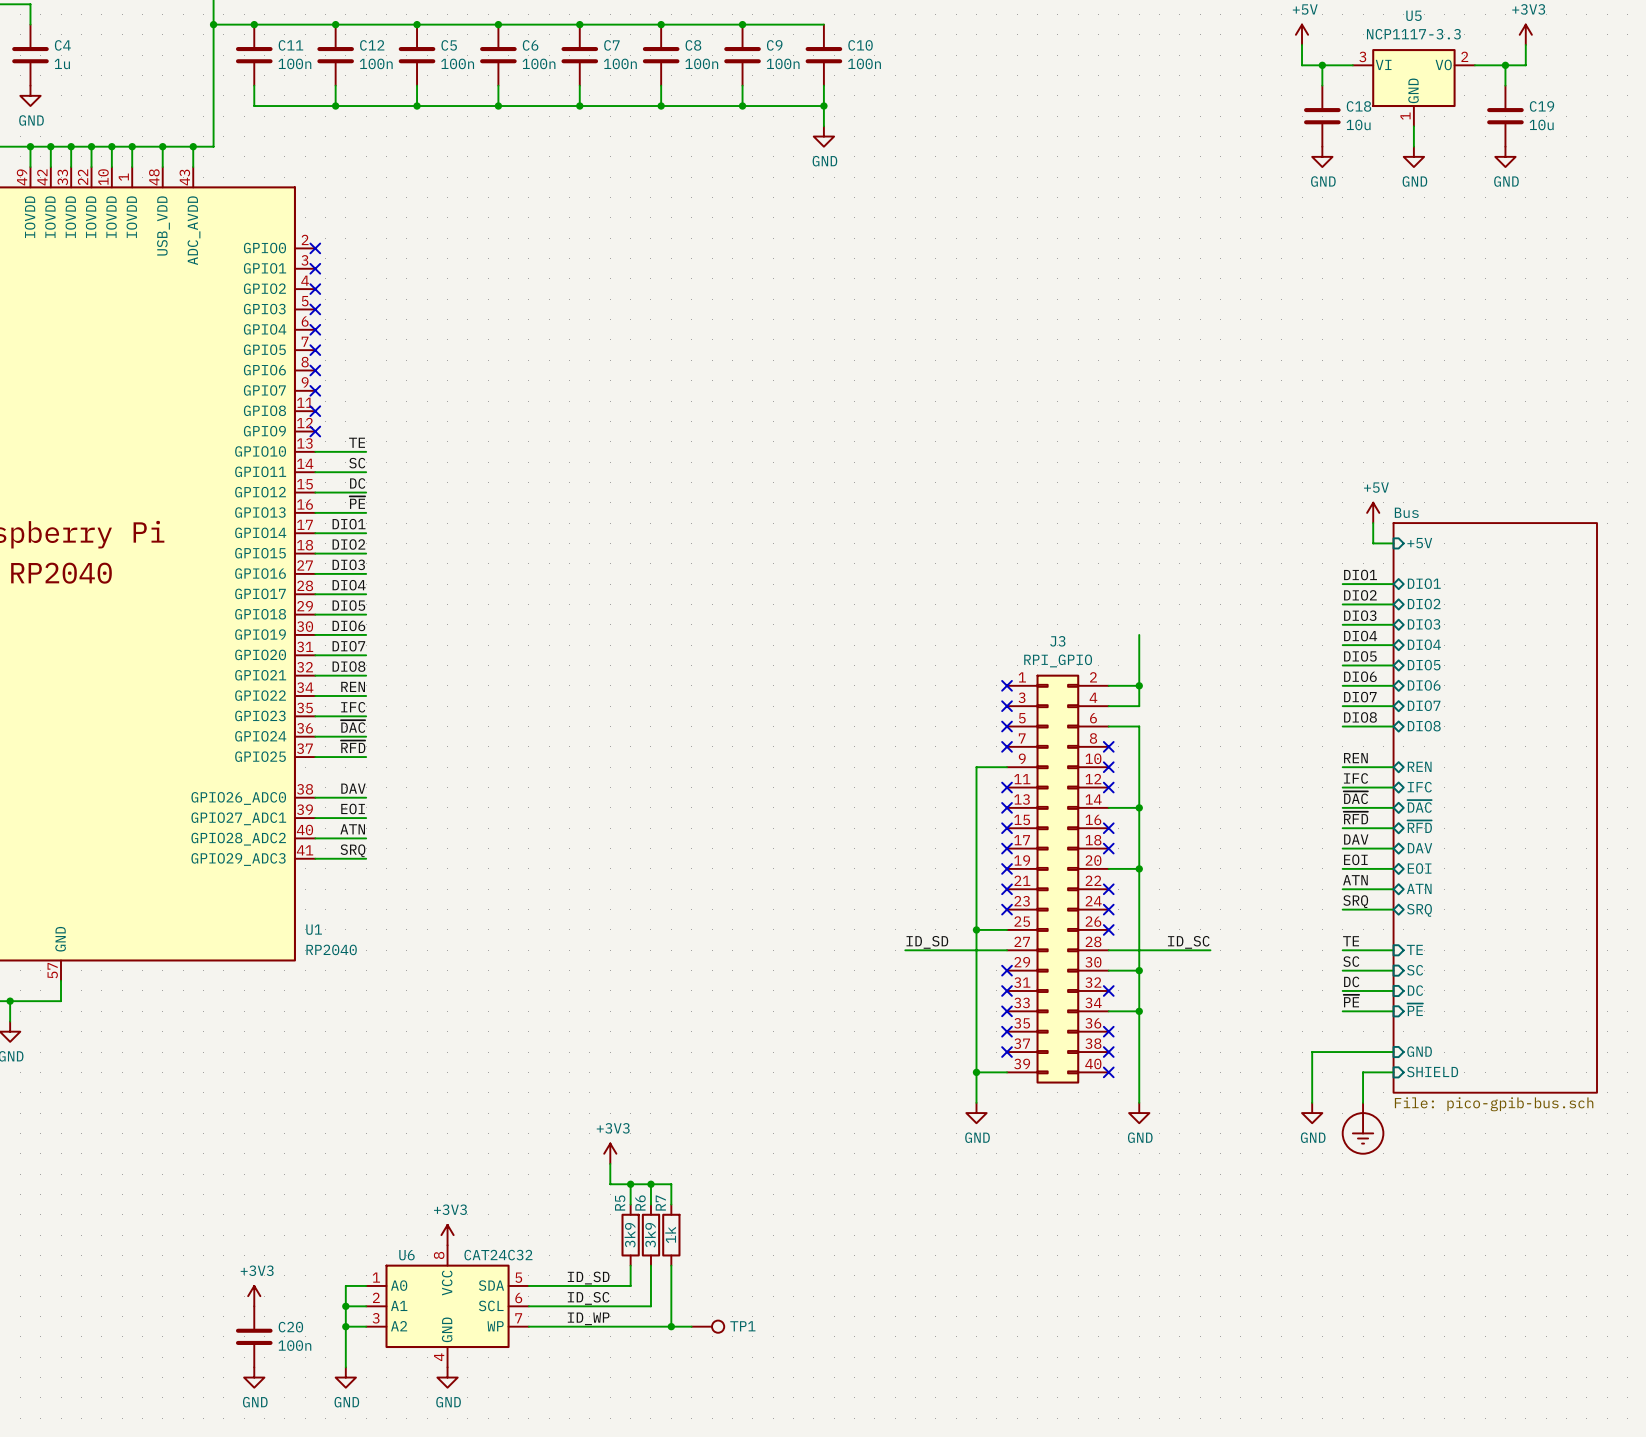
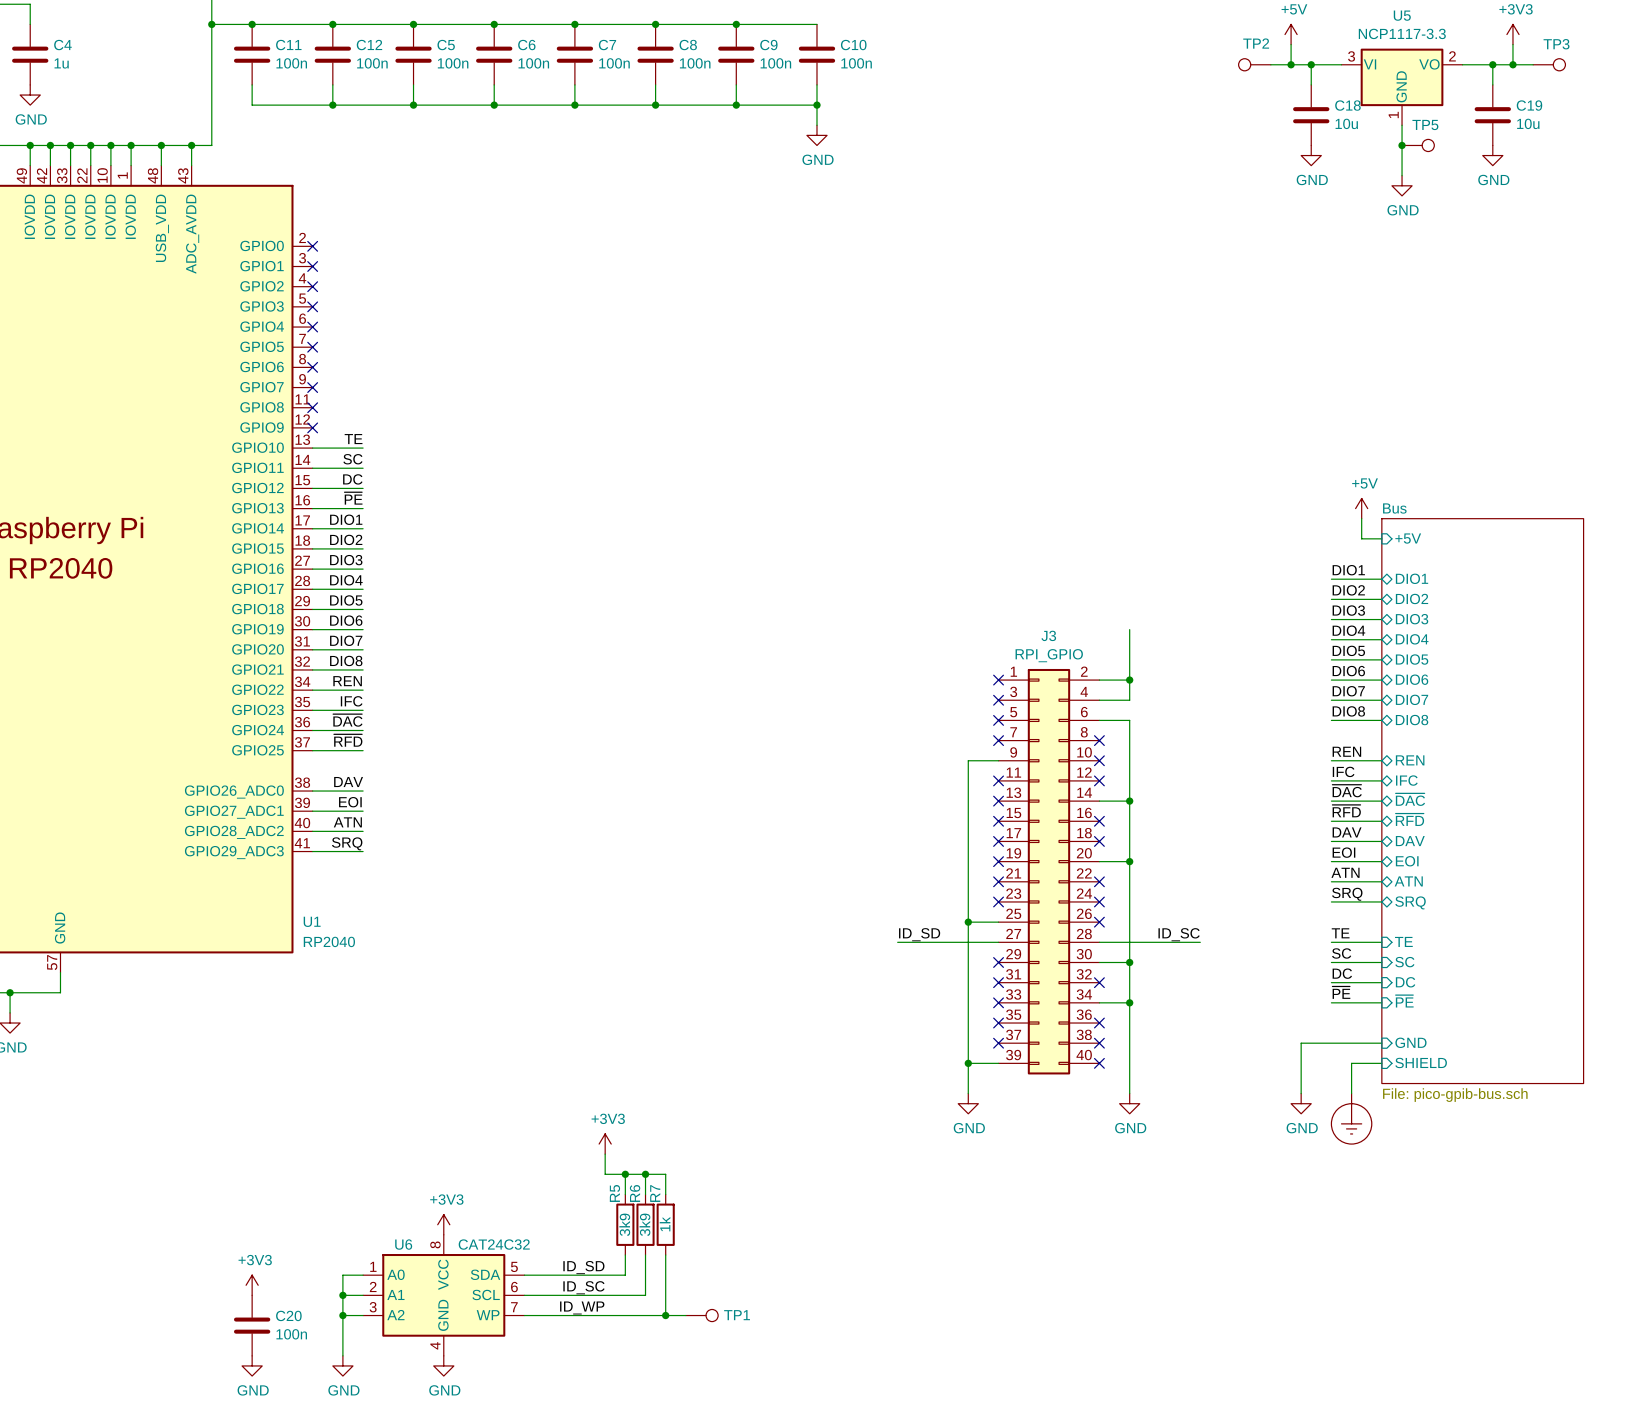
TP2: none -> (1254, 64)
wire: none -> (1270, 64) (1291, 64)
junction: none -> (1291, 64)
wire: none -> (1512, 64) (1533, 64)
junction: none -> (1512, 64)
TP3: none -> (1549, 64)
wire: none -> (1402, 145) (1402, 175)
junction: none -> (1402, 145)
TP5: none -> (1418, 145)
power symbol position: GND (1413, 156) -> GND (1402, 185)

